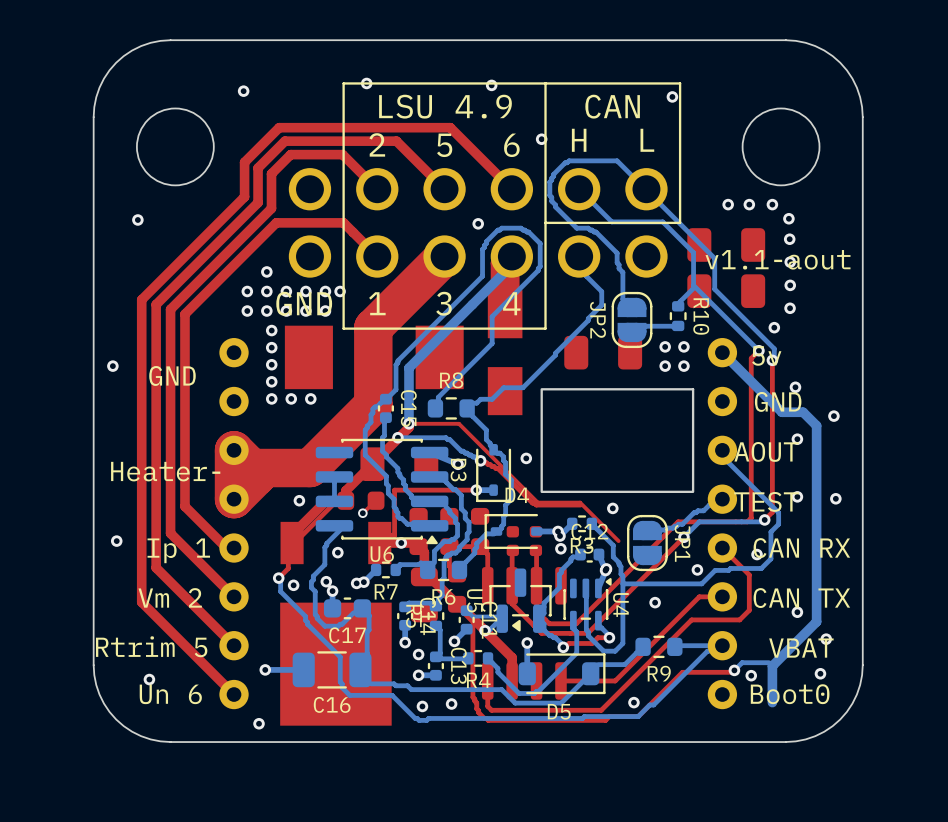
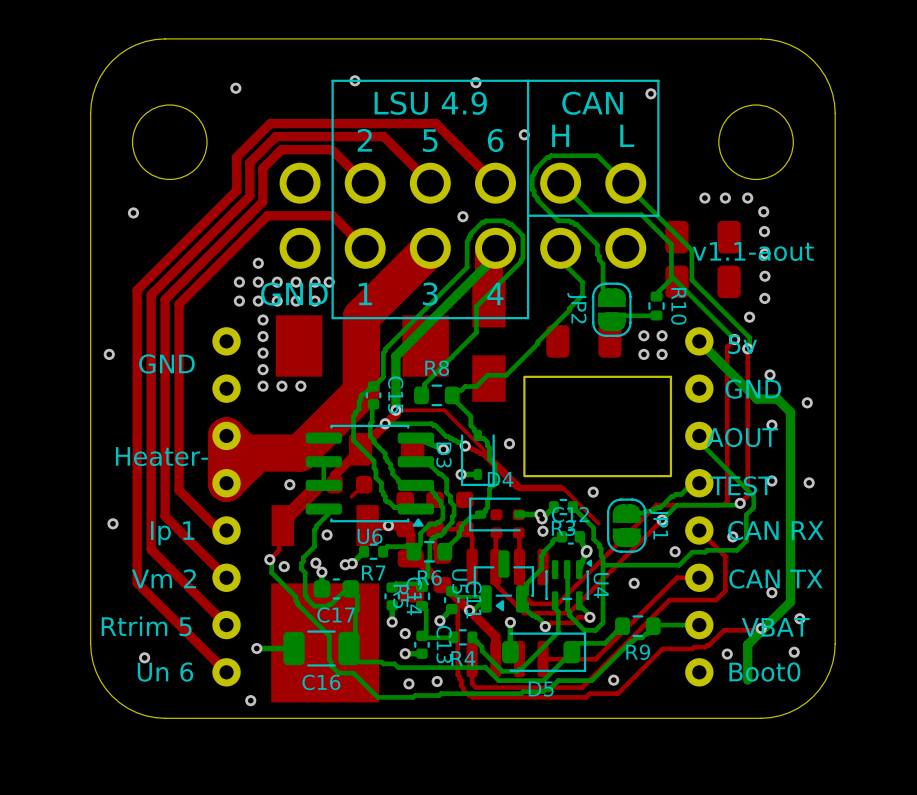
top track: (476, 490) (394, 490) (394, 535) (383, 535) -> none
via: (362, 513) -> none
bottom track: (709, 651) (653, 705) (649, 705) (638, 716) (453, 718) -> (647, 634) (630, 641) (591, 680) (558, 680) (549, 689) (543, 691) (441, 693) (439, 695)
bottom track: (769, 662) (742, 662) (734, 670) -> none
top track: (734, 670) (732, 672) (682, 672) -> (761, 628) (759, 630) (723, 630) (705, 647) (662, 648) (660, 650)
via position: (734, 670) -> (761, 628)
bottom track: (365, 695) (392, 695) (419, 720) -> (353, 673) (377, 697) (405, 697)

